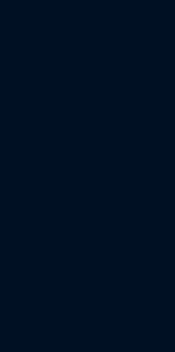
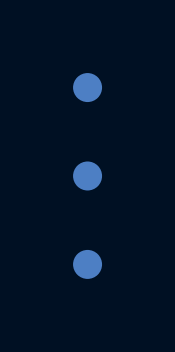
part: none -> (87, 87)
part: none -> (87, 175)
part: none -> (87, 264)

